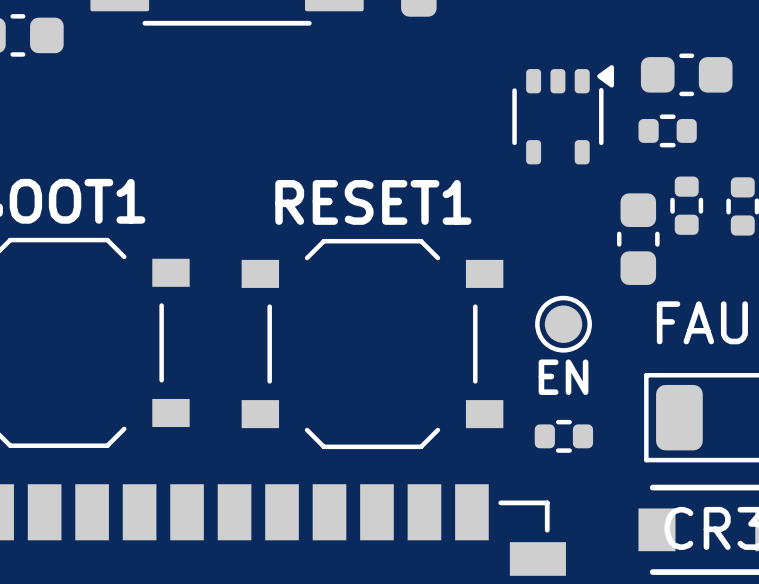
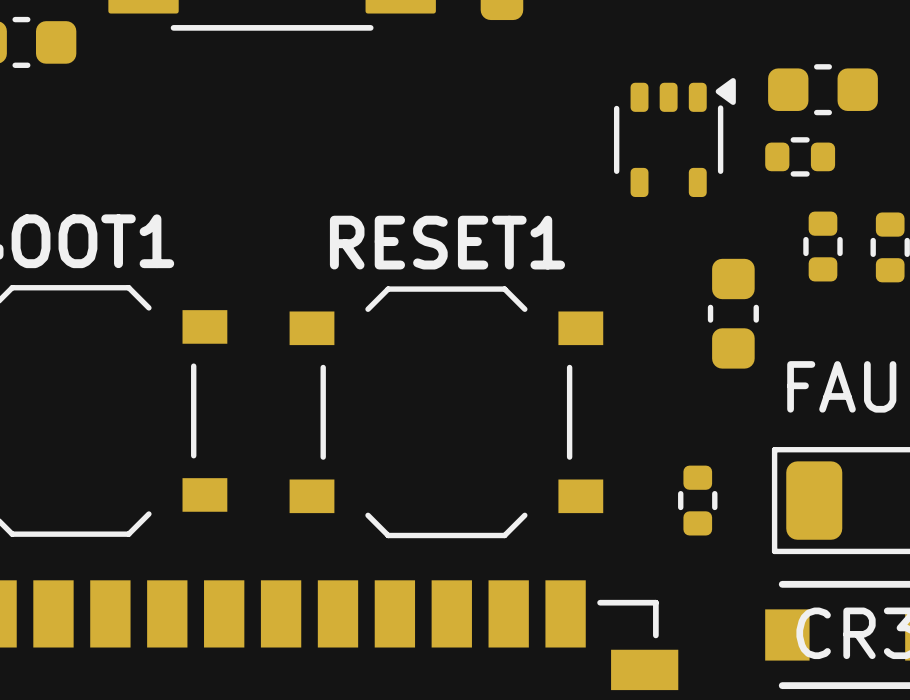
part position: (638, 239) -> (733, 313)
EN: (563, 324) -> none
part rotation: 0° (563, 436) -> 90° clockwise (697, 500)

